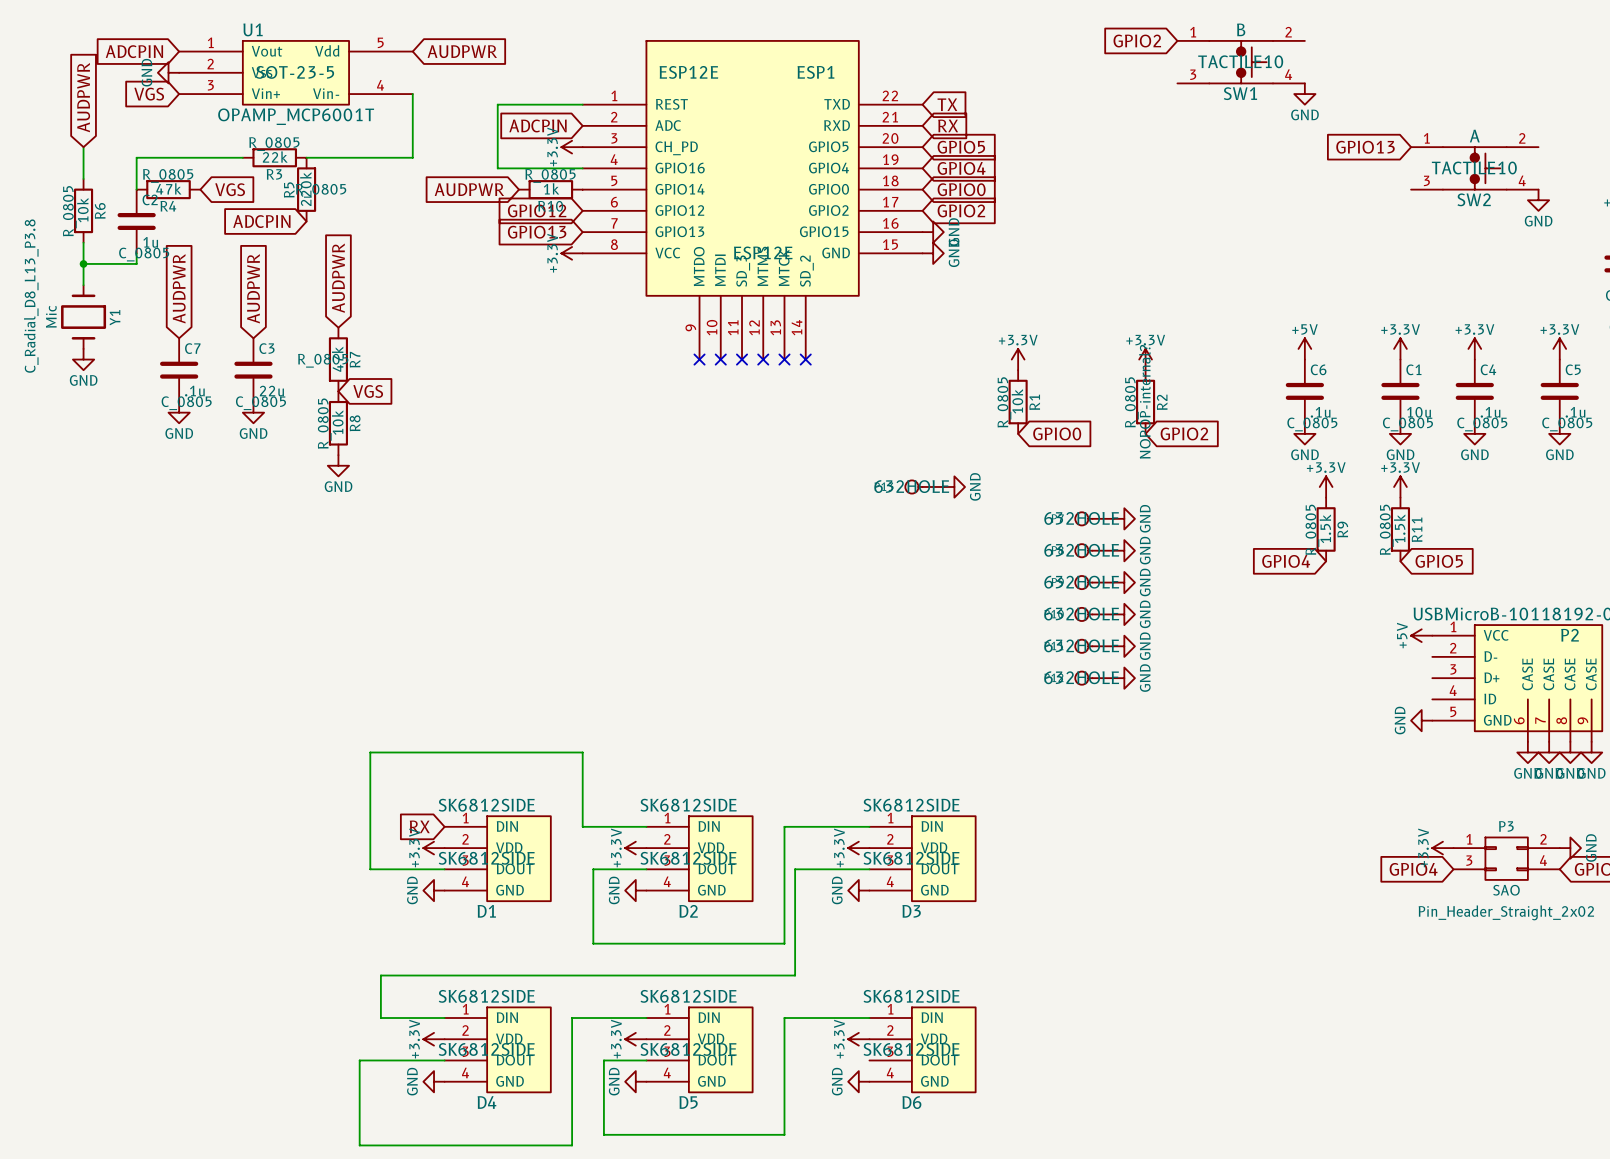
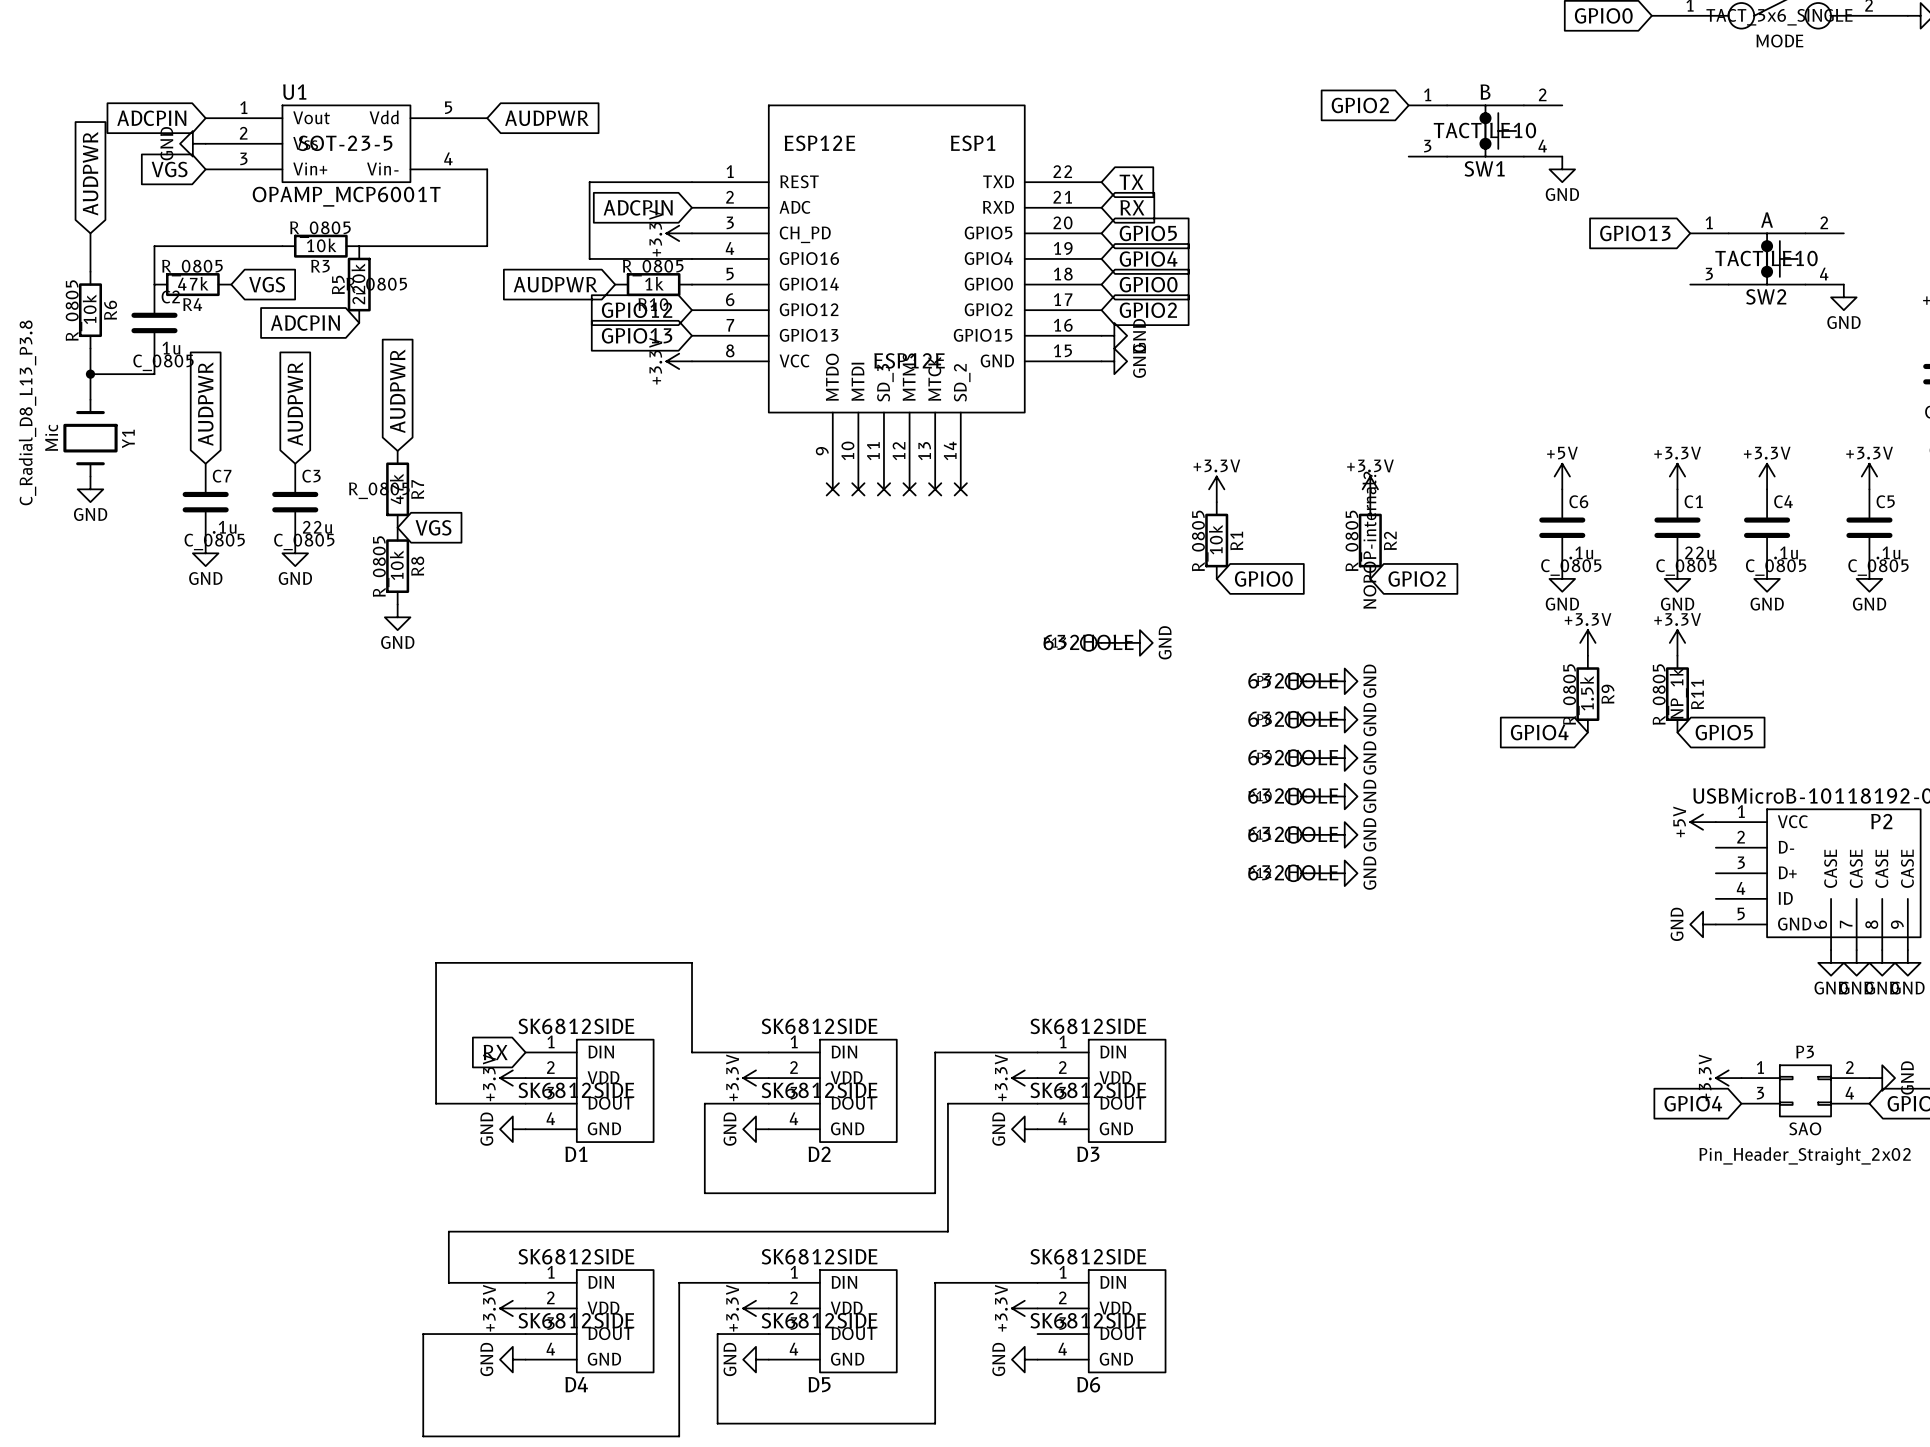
R3 value: 22k (275, 157) -> 10k (321, 245)
C1 value: 10u (1419, 412) -> 22u (1699, 552)
R11 value: 1.5k (1399, 528) -> NP_1k (1678, 693)

